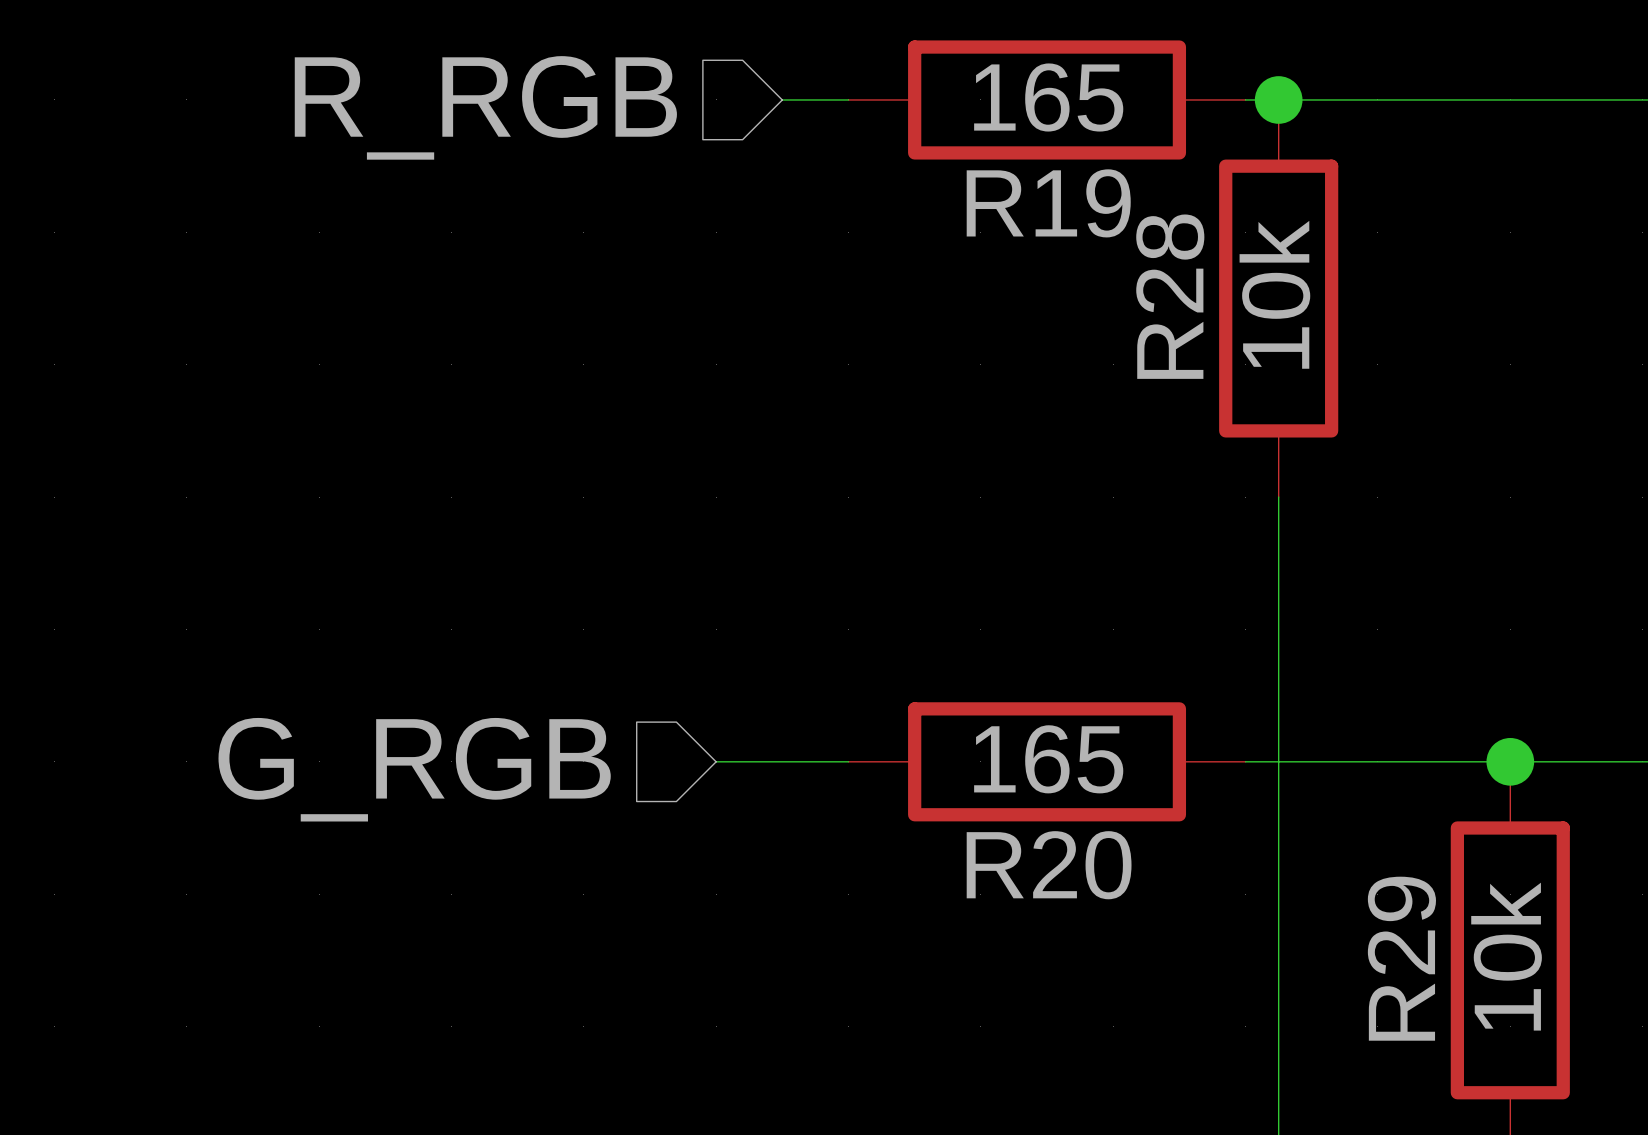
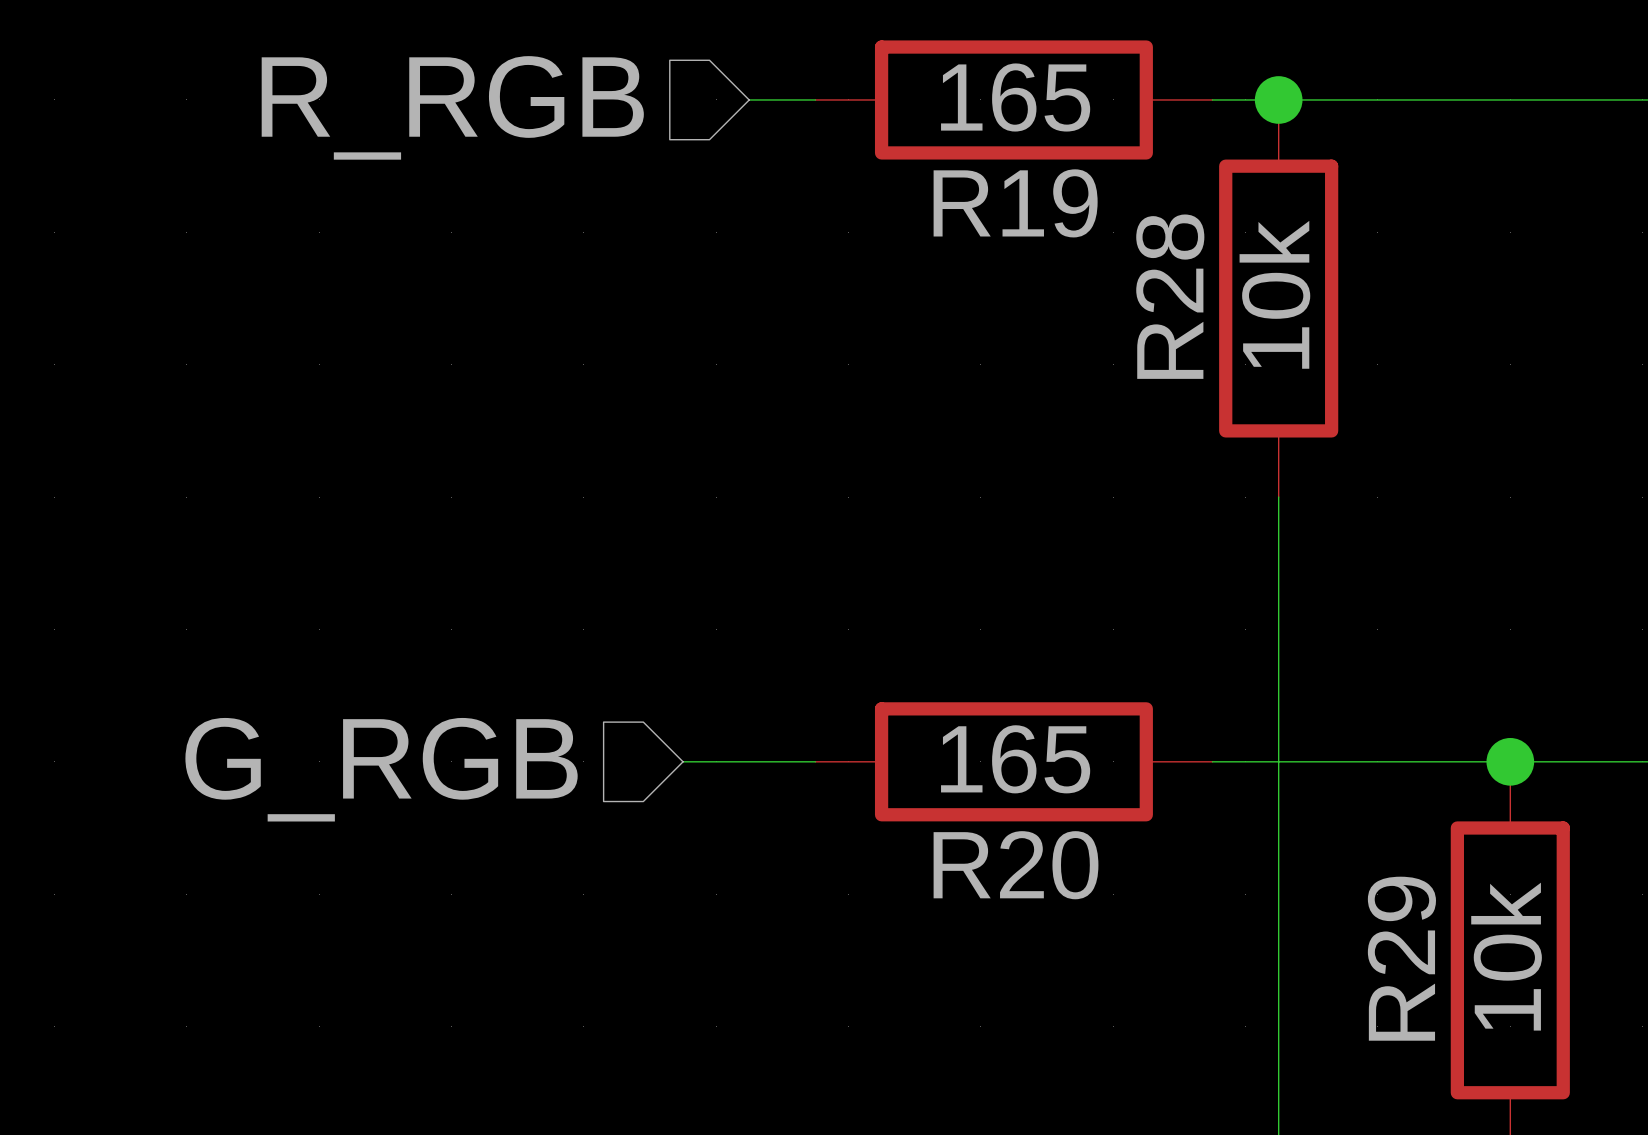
wire: none -> (749, 99) (782, 99)
R19 position: (1047, 99) -> (1013, 99)
hierarchical label position: R_RGB (485, 107) -> R_RGB (452, 107)
wire: none -> (683, 761) (716, 761)
R20 position: (1047, 761) -> (1013, 761)
hierarchical label position: G_RGB (414, 769) -> G_RGB (381, 769)

